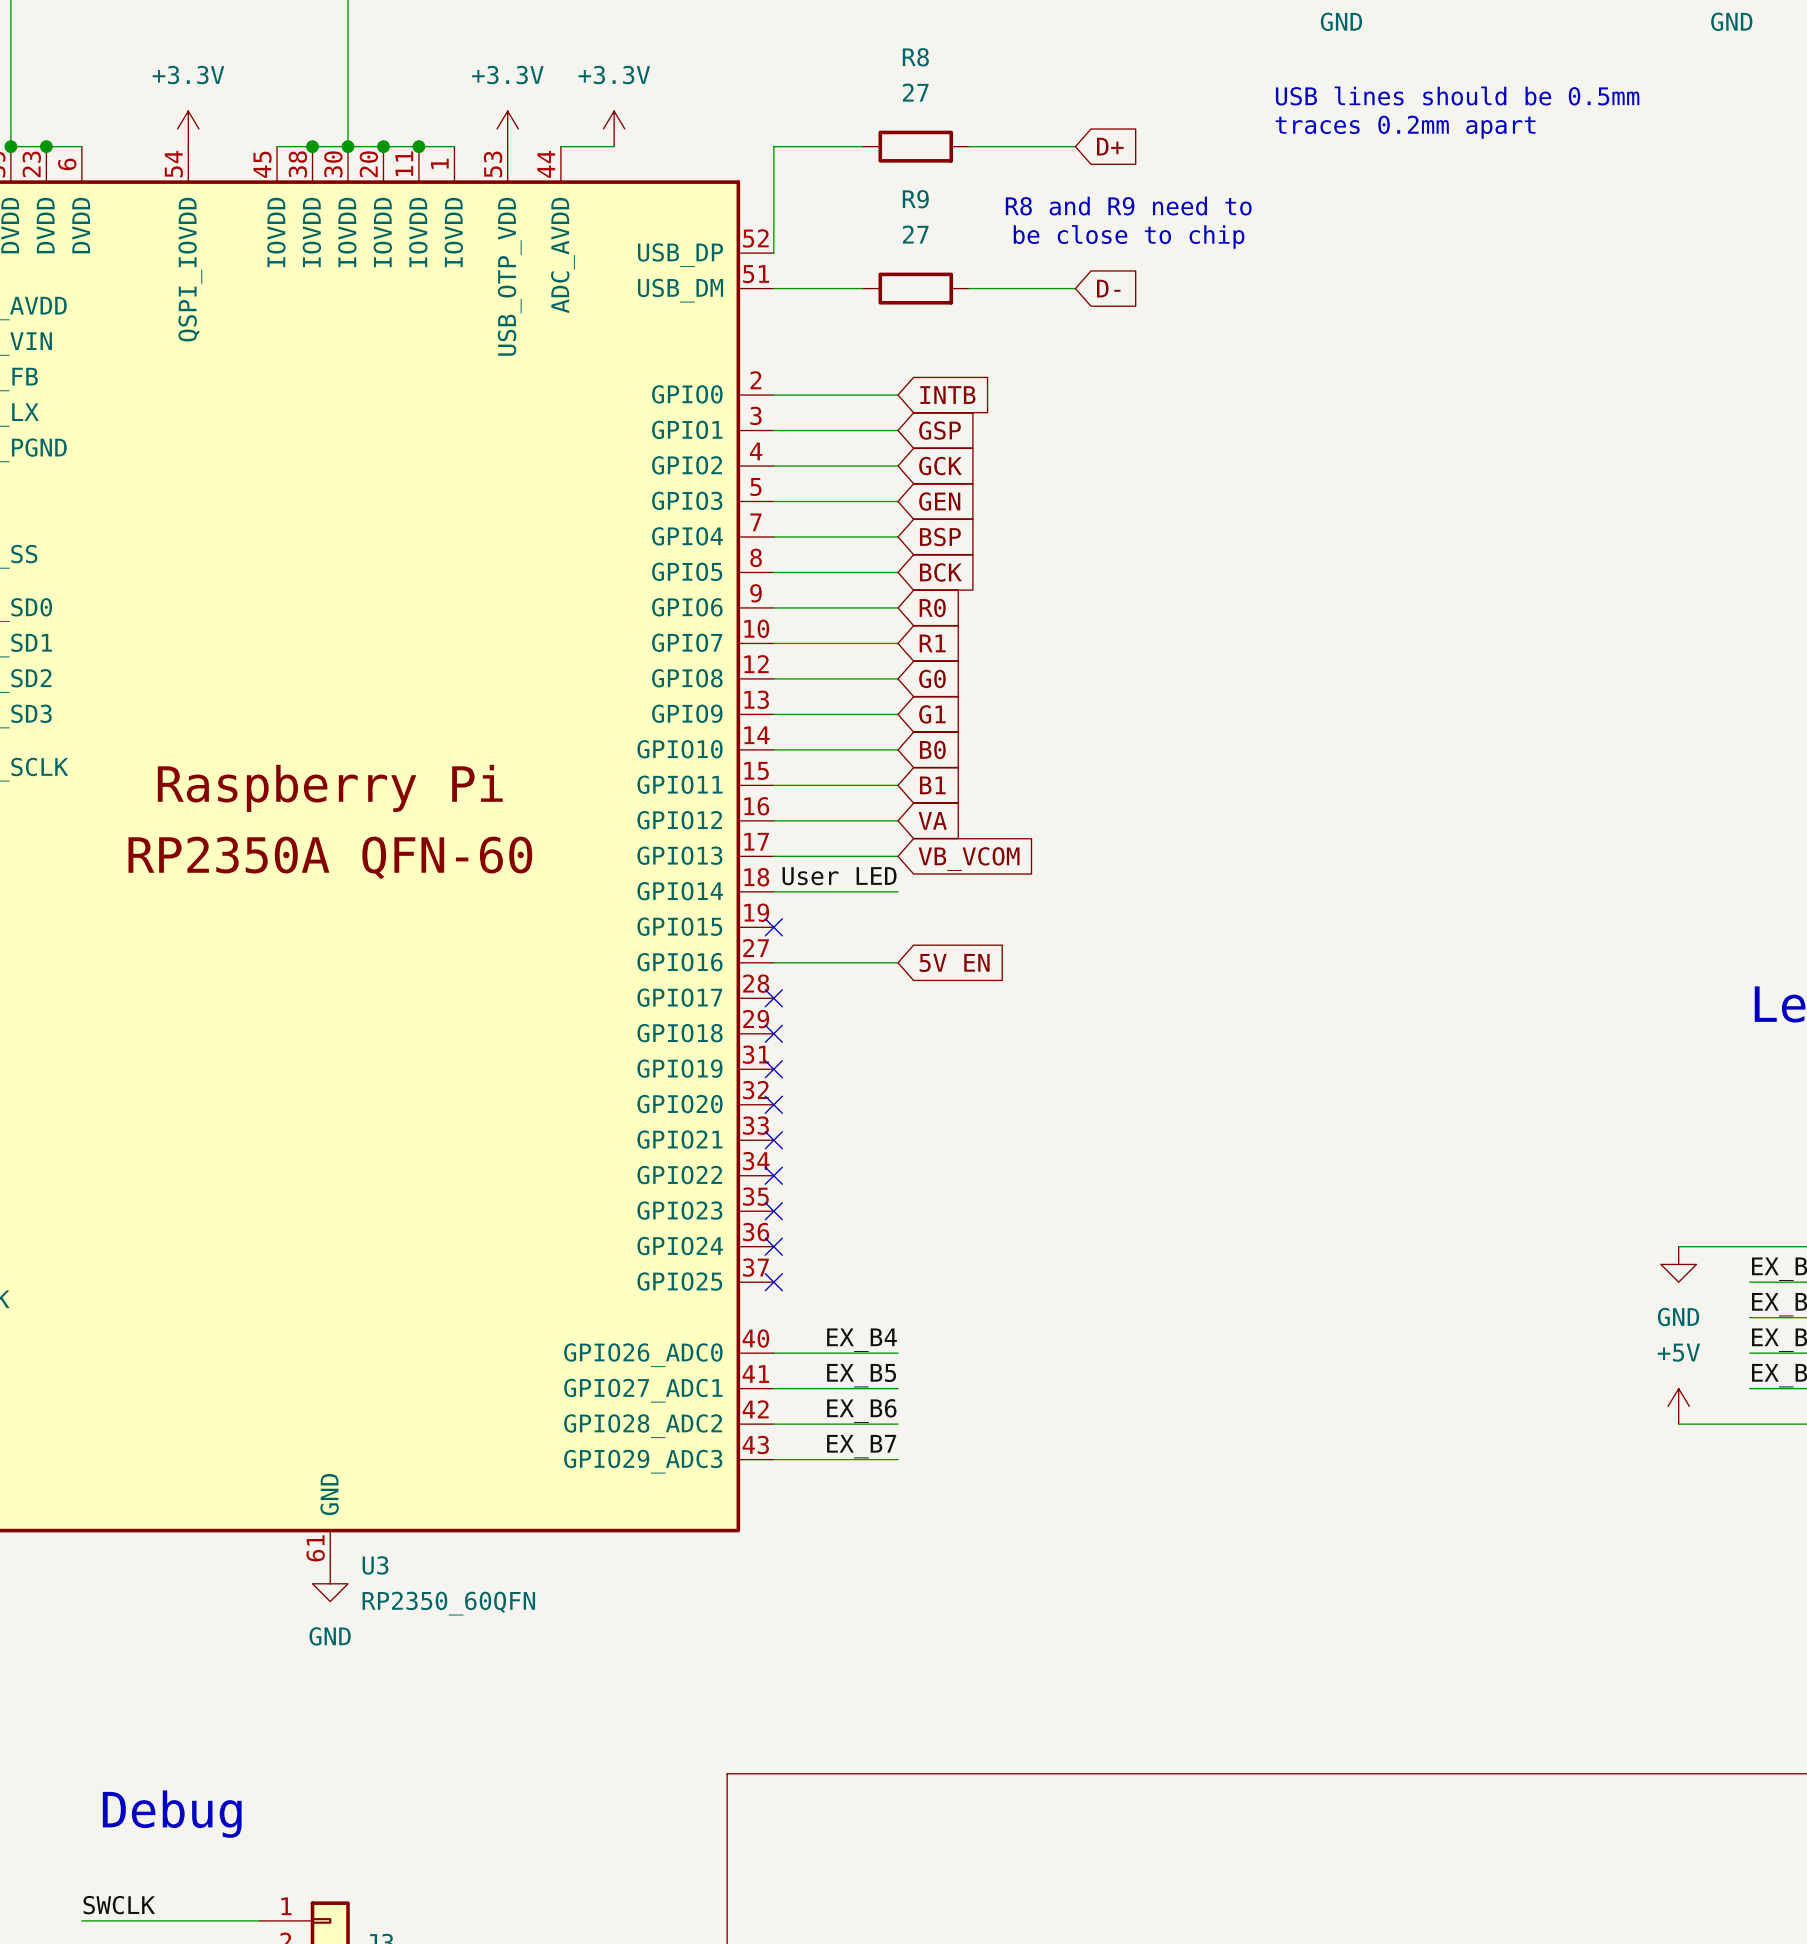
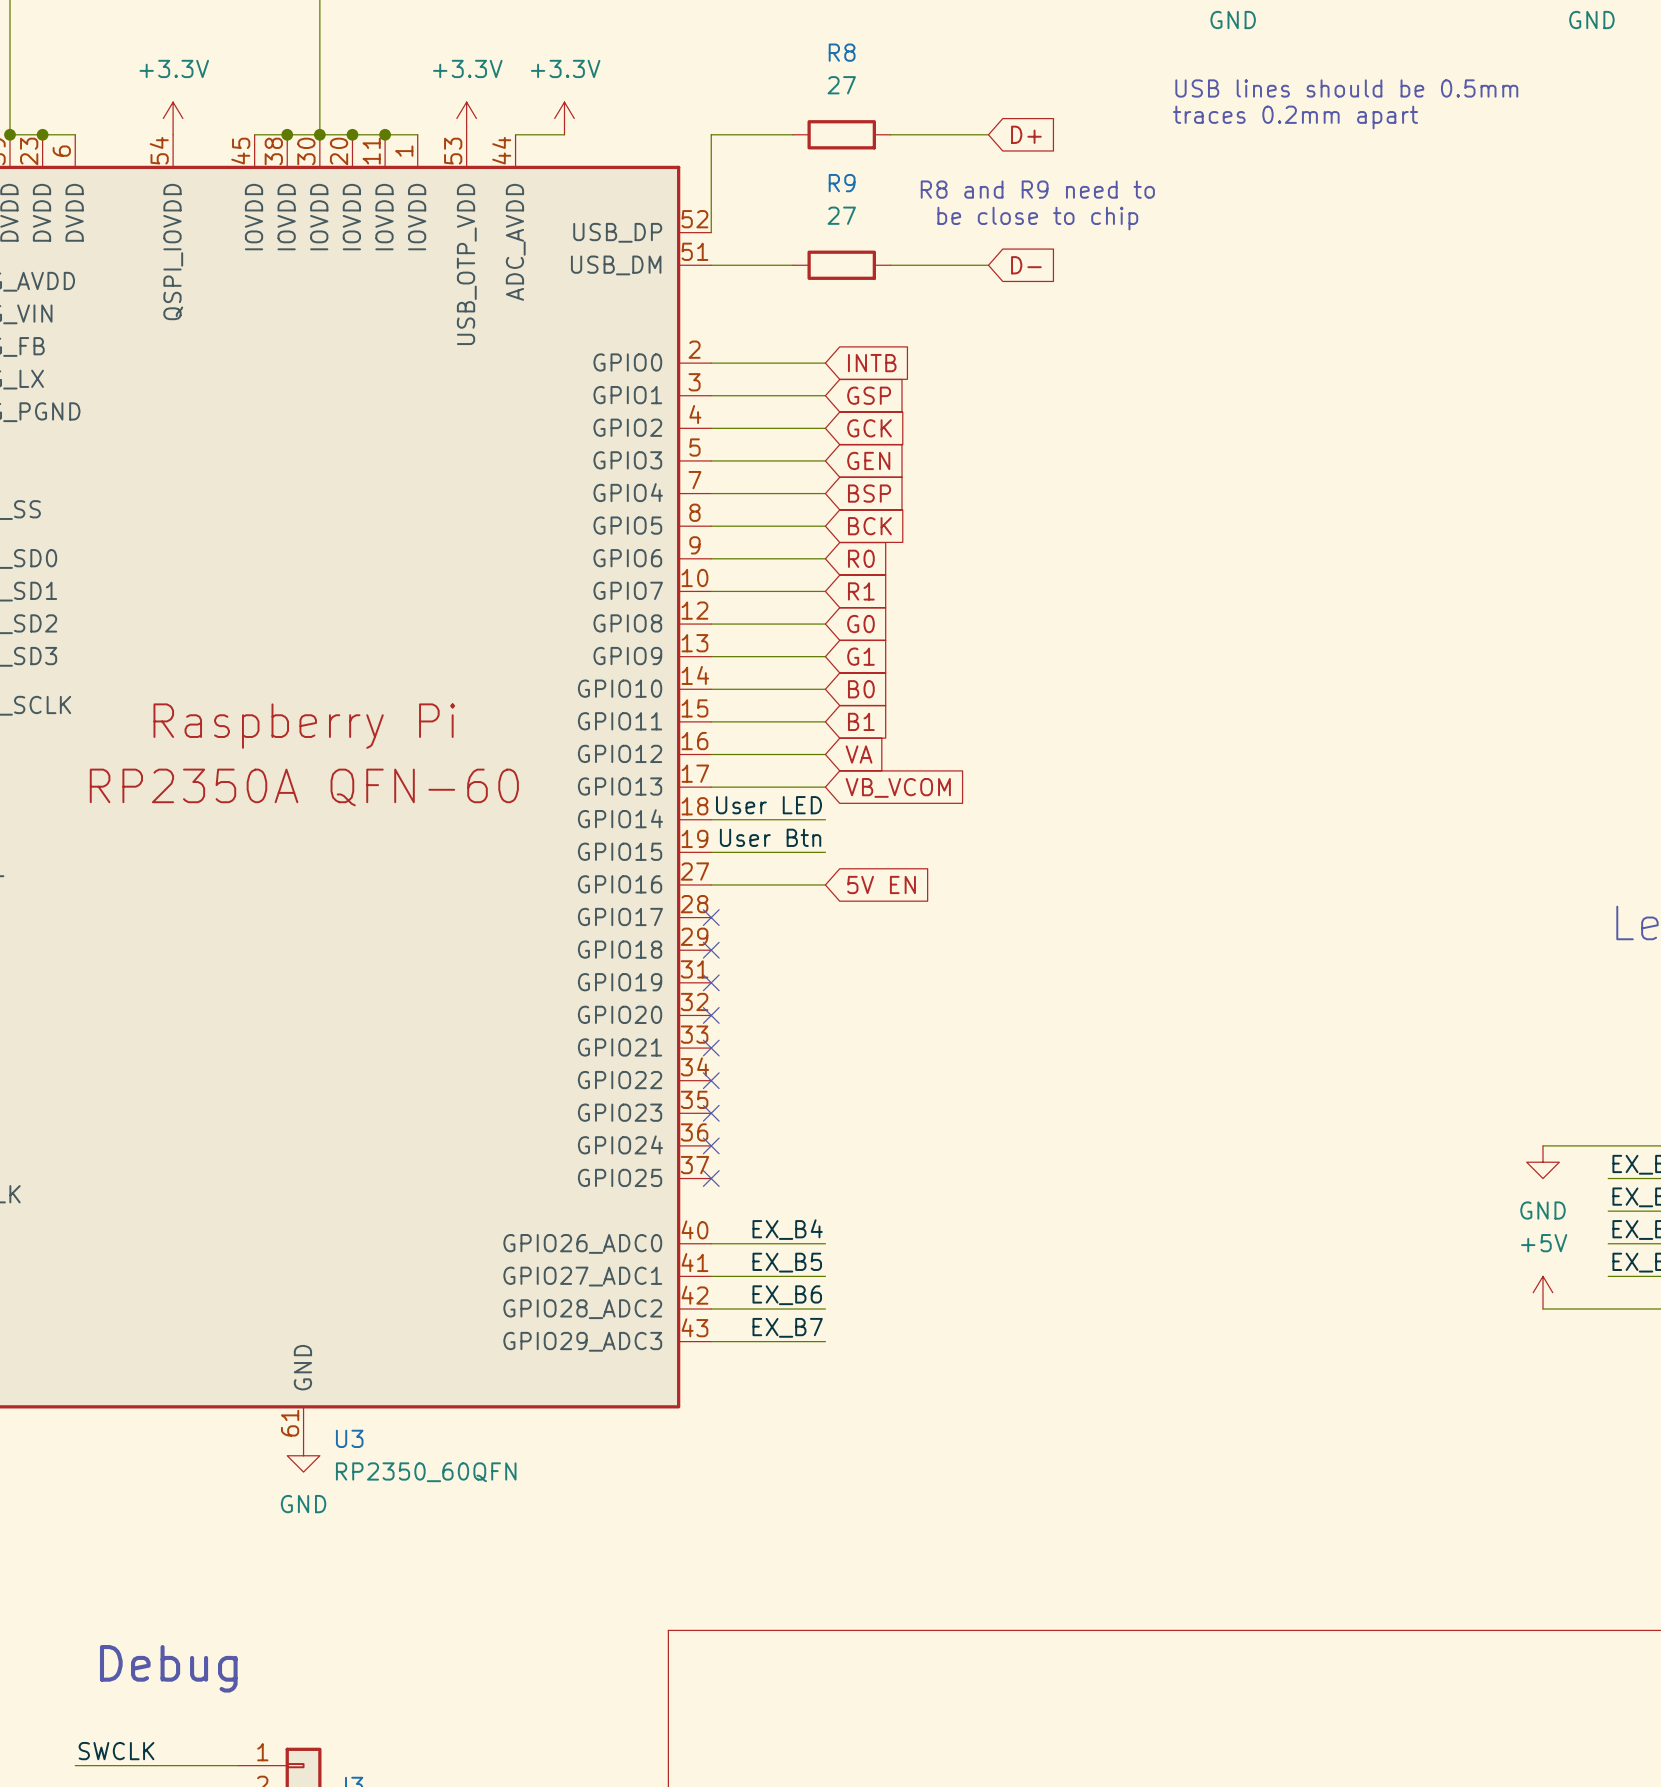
label: none -> User Btn (770, 837)
wire: none -> (711, 852) (825, 852)
no-connect mark: (773, 927) -> none

